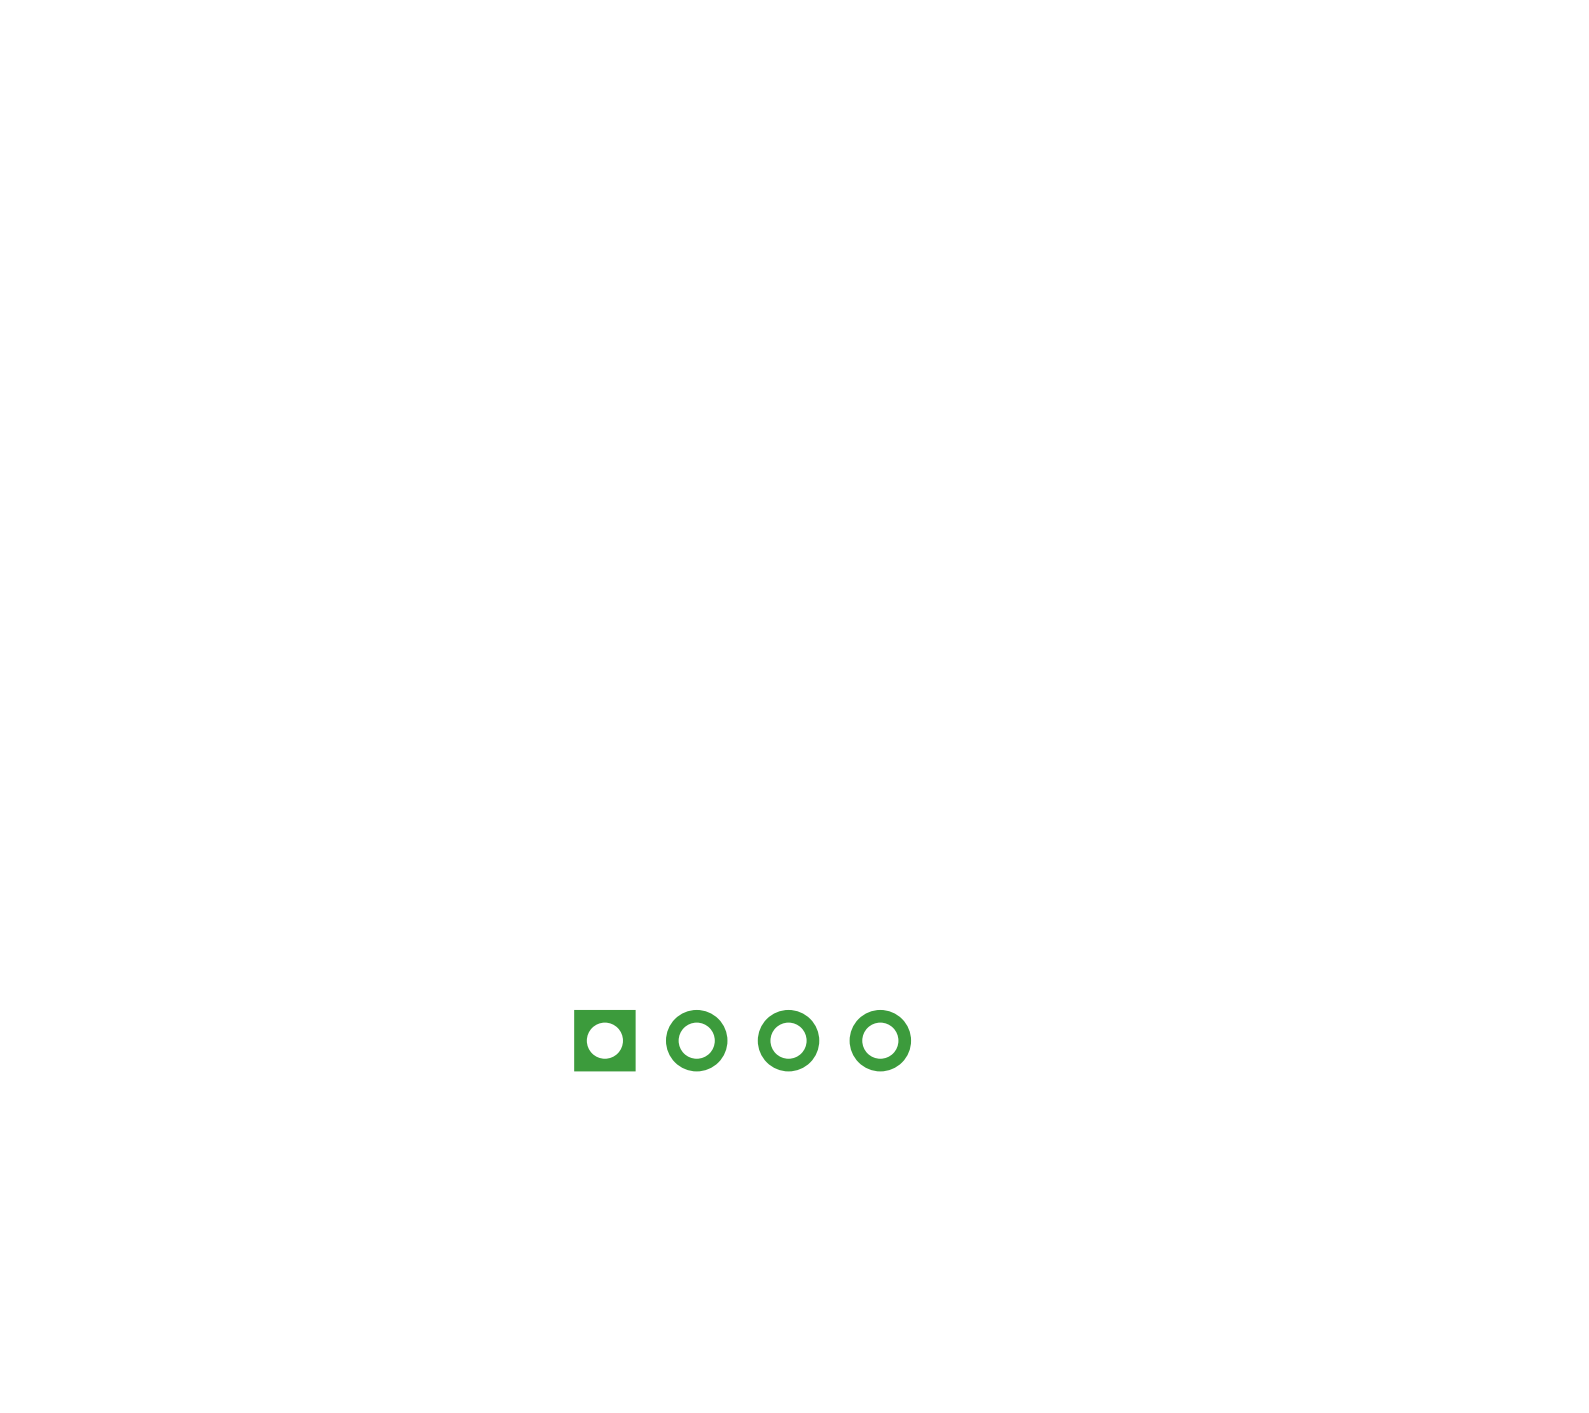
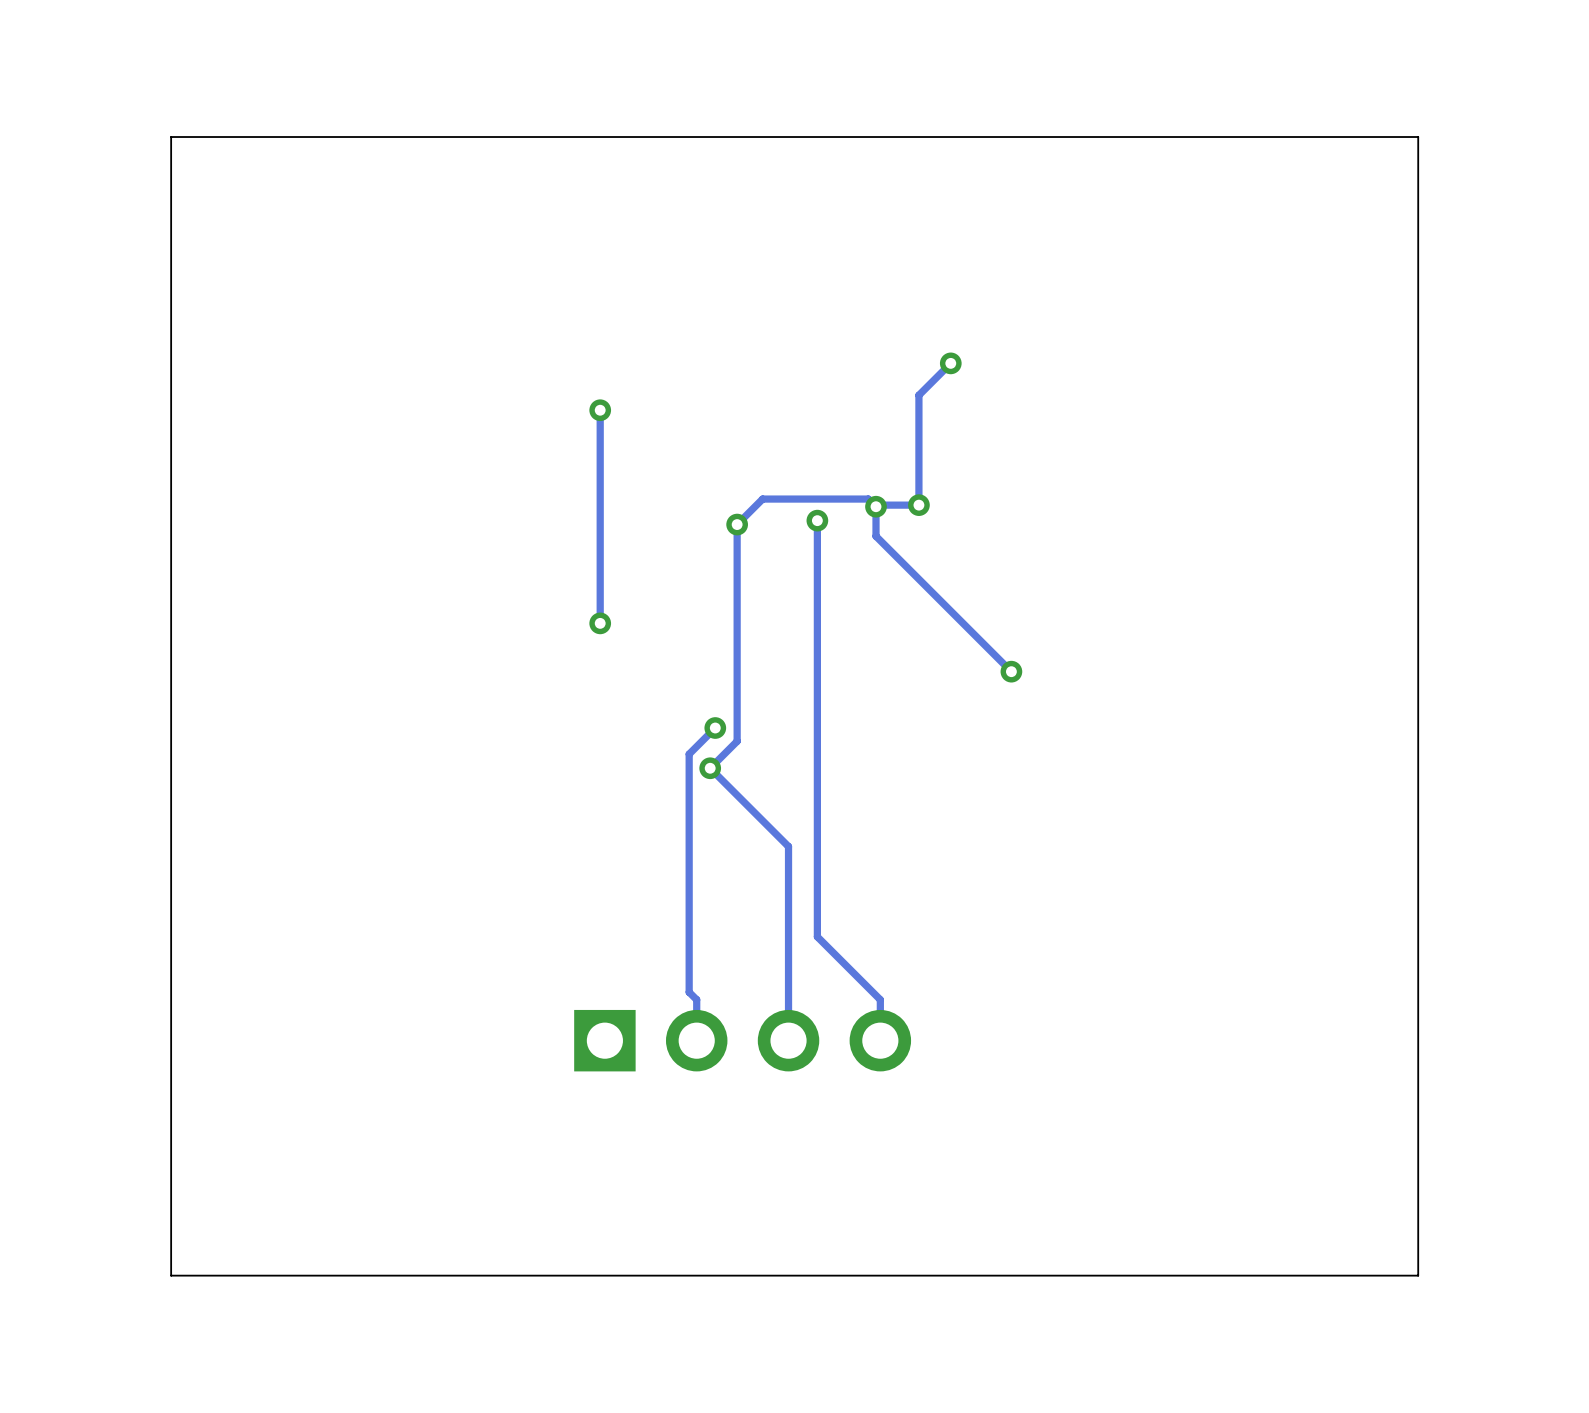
board edge: none -> (1418, 137) (171, 137) (171, 1275) (1418, 1275) (1418, 137)
track: none -> (950, 363) (918, 395) (918, 505) (877, 505) (876, 506)
via: none -> (950, 363)
track: none -> (600, 410) (600, 623)
via: none -> (600, 410)
via: none -> (918, 505)
track: none -> (876, 506) (868, 499) (762, 499) (737, 524) (737, 741) (710, 768) (788, 846) (788, 1040)
track: none -> (876, 506) (876, 536) (1011, 671)
via: none -> (876, 506)
track: none -> (817, 520) (817, 936) (880, 999) (880, 1040)
via: none -> (817, 520)
via: none -> (737, 524)
via: none -> (600, 623)
via: none -> (1011, 671)
track: none -> (715, 728) (689, 754) (689, 992) (696, 999) (696, 1040)
via: none -> (715, 728)
via: none -> (710, 768)

